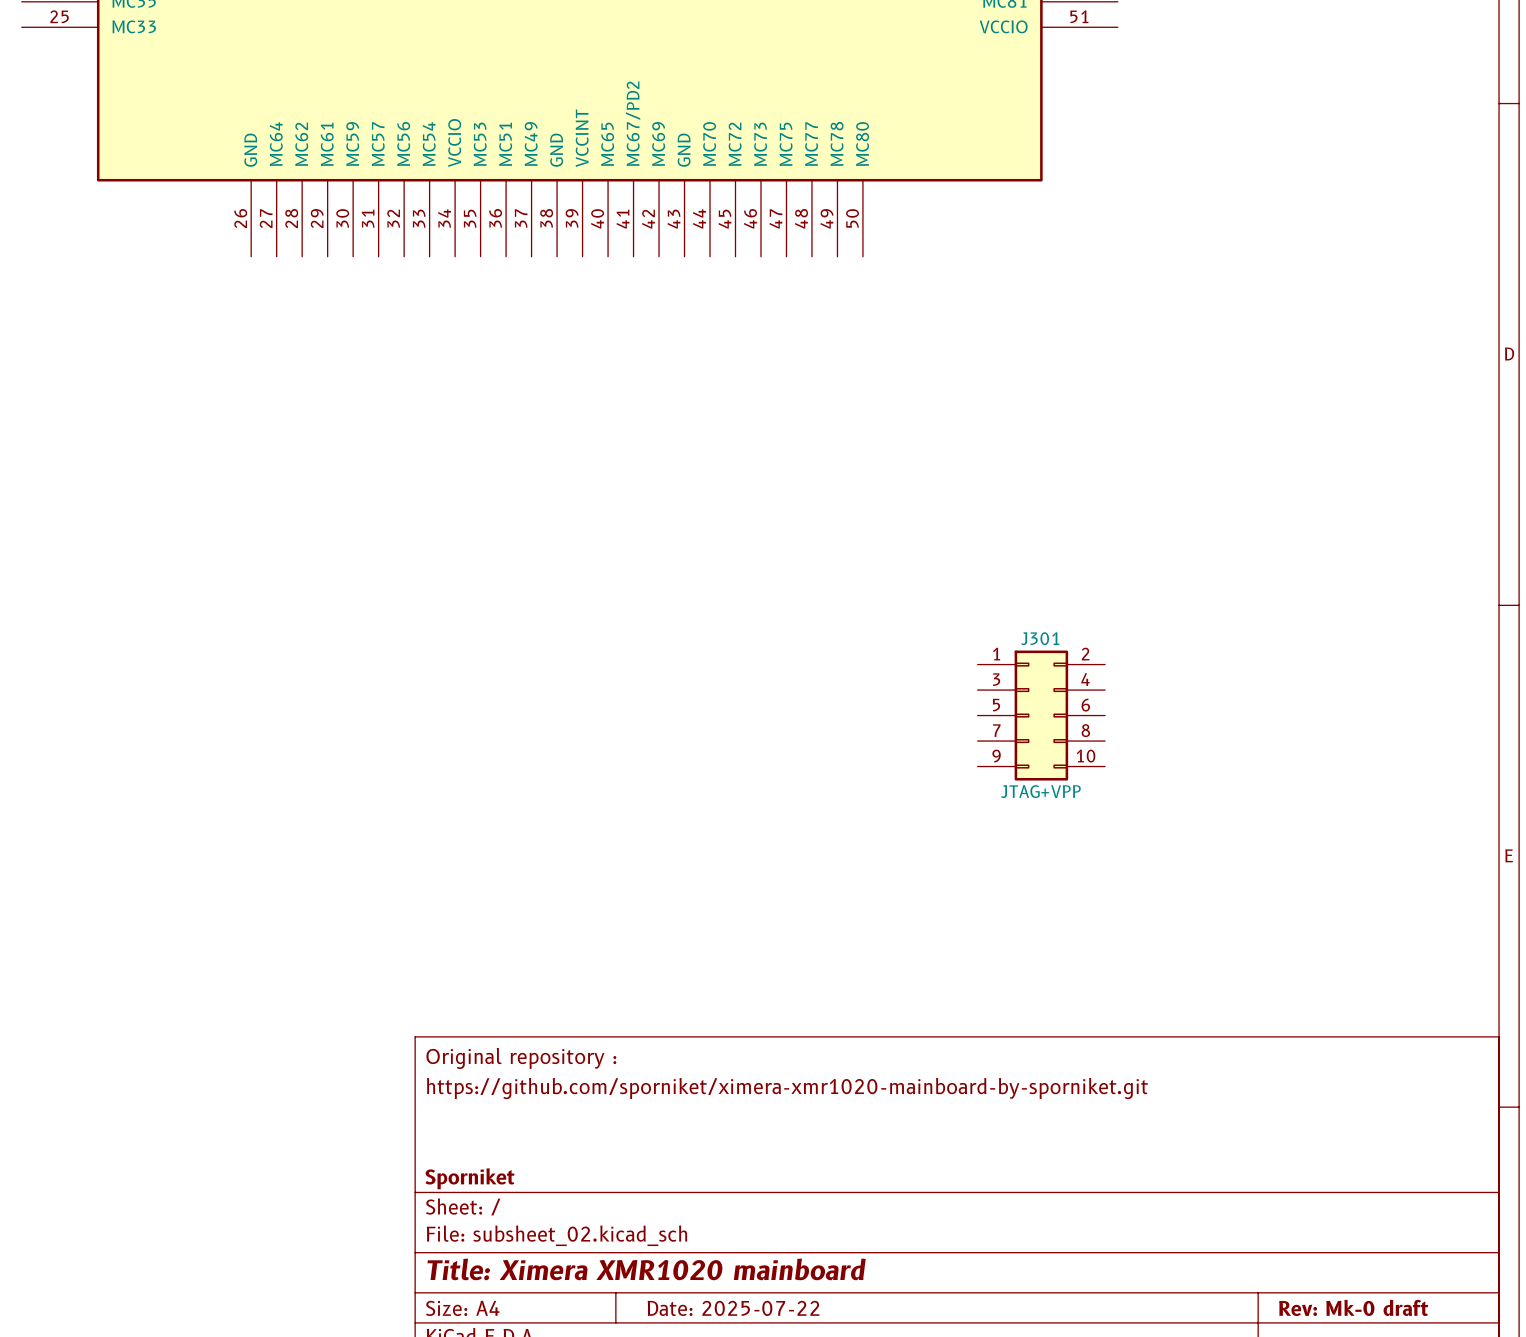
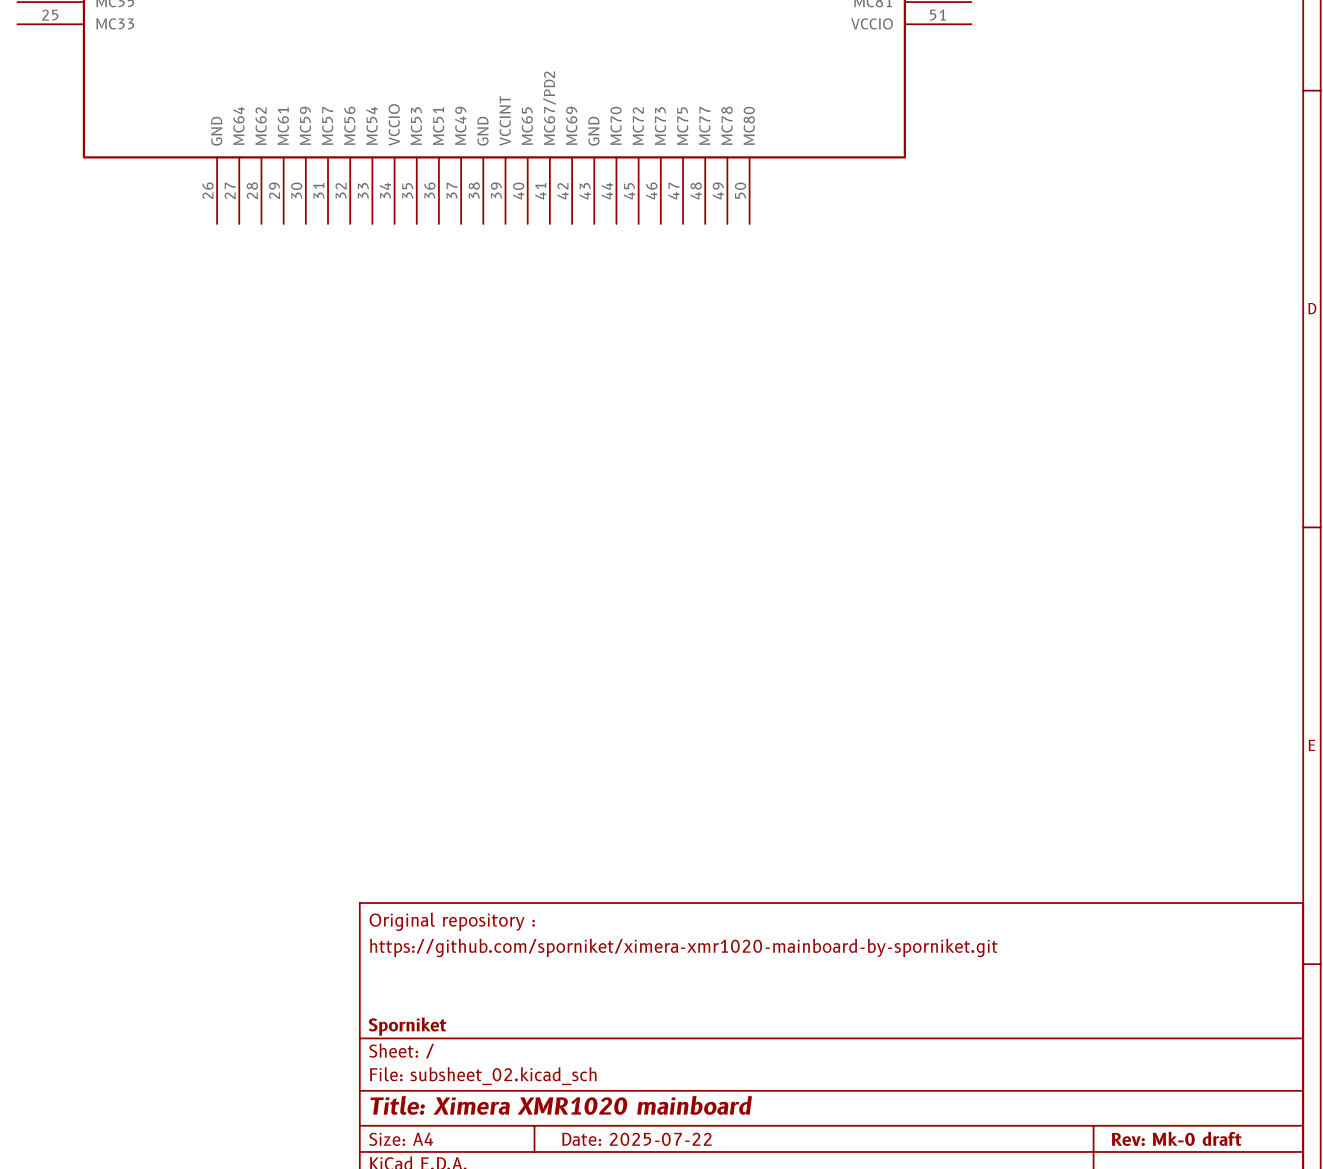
J301: JTAG+VPP (1041, 715) -> none

